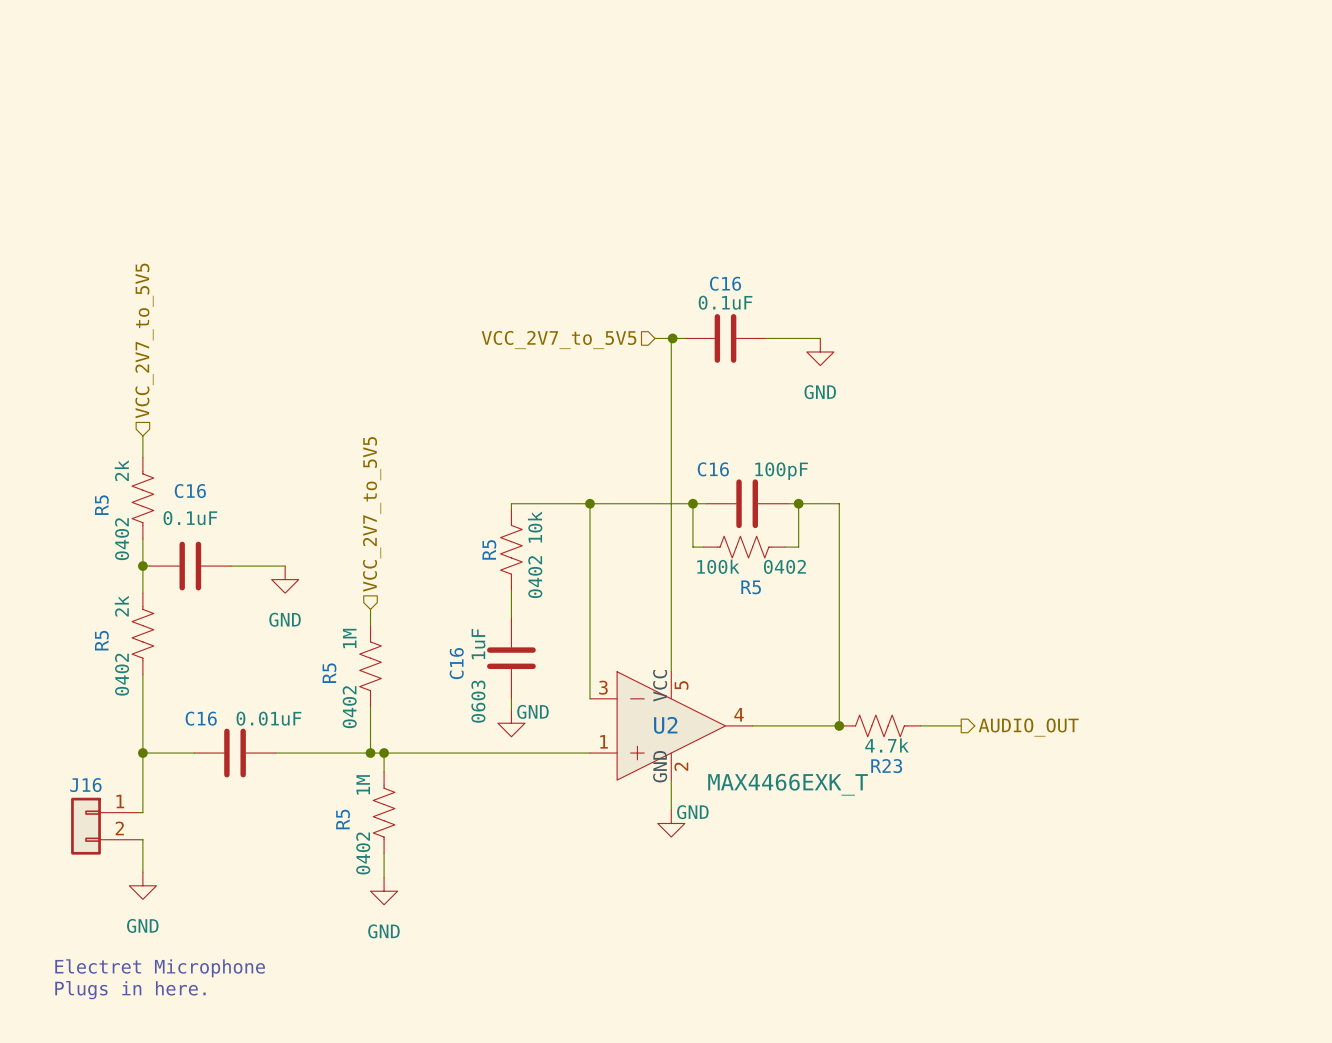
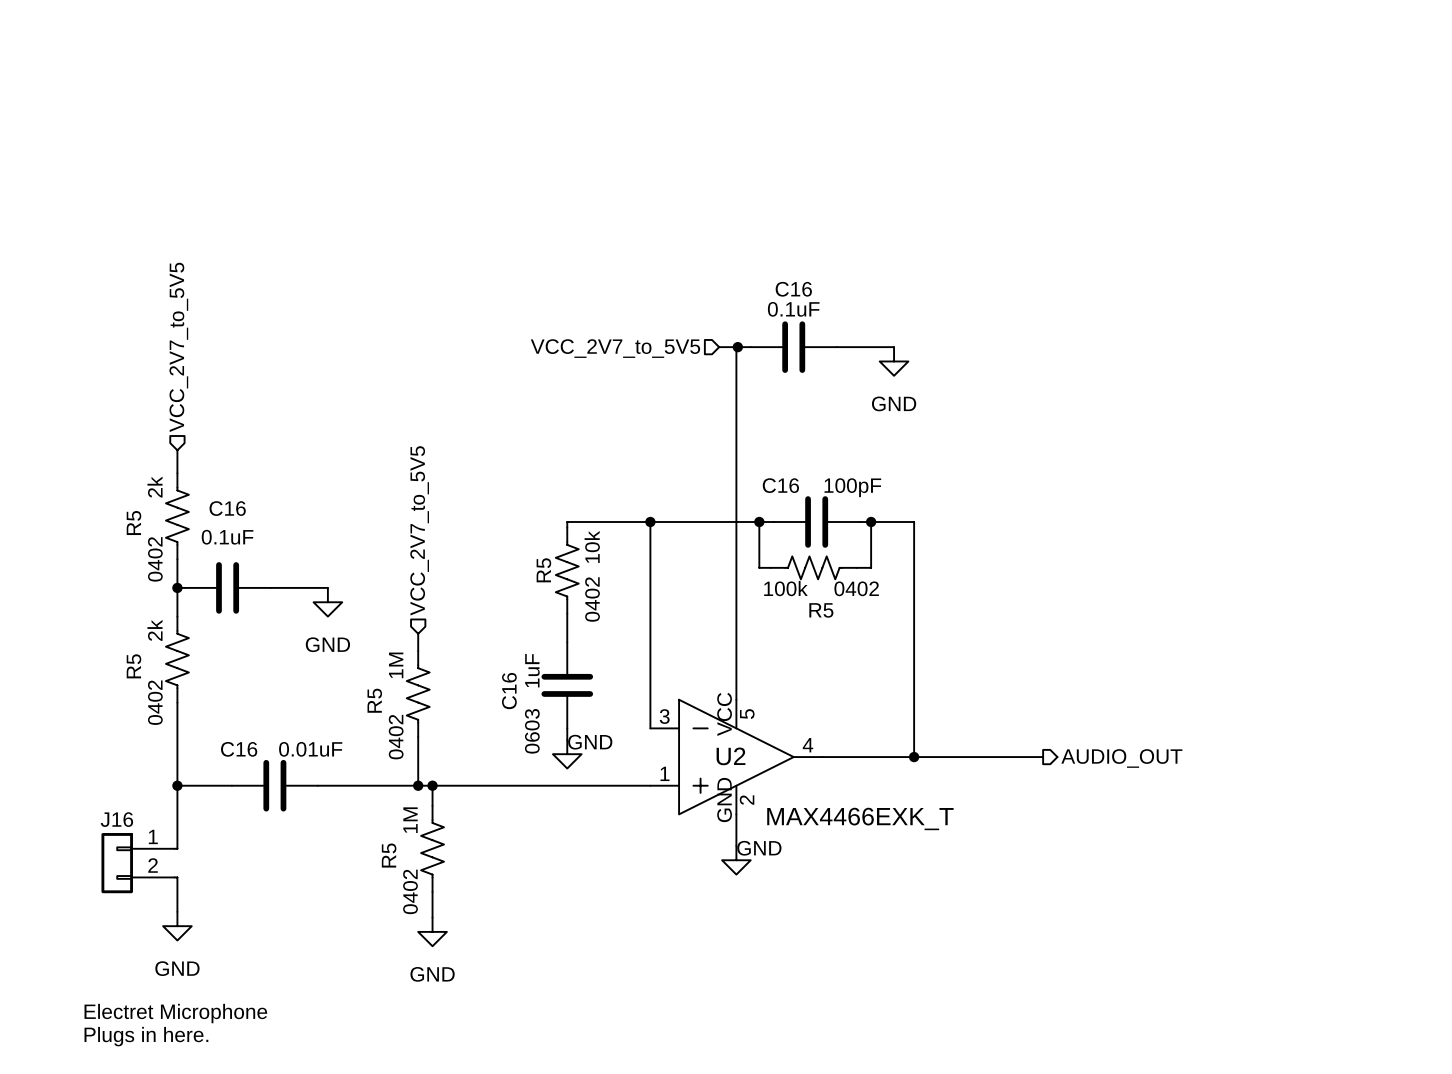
R23: 4.7k (879, 725) -> none

